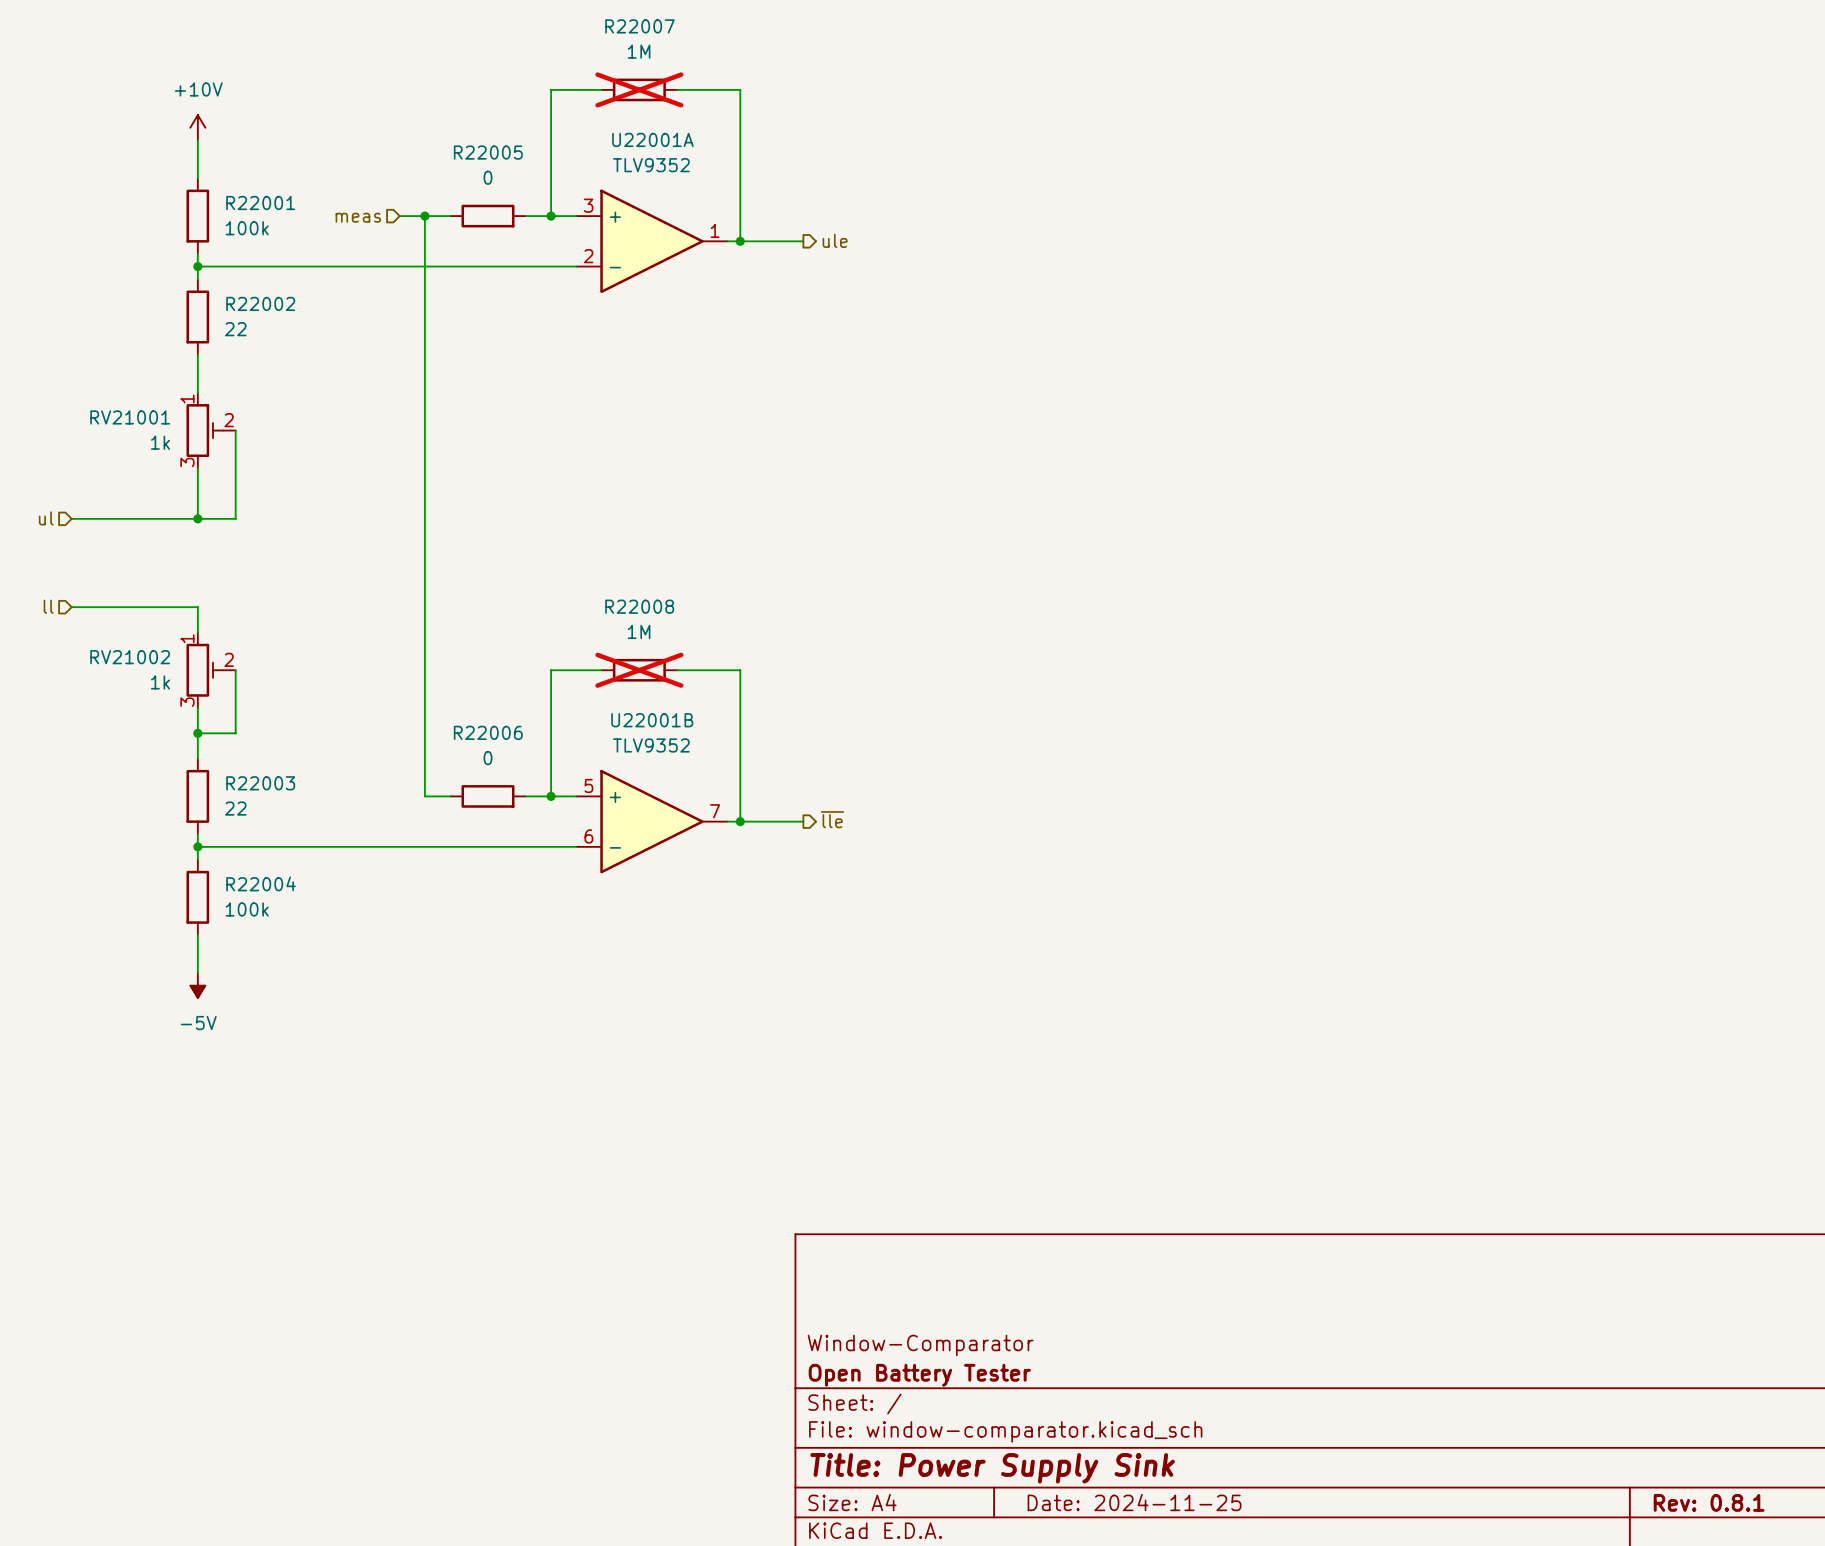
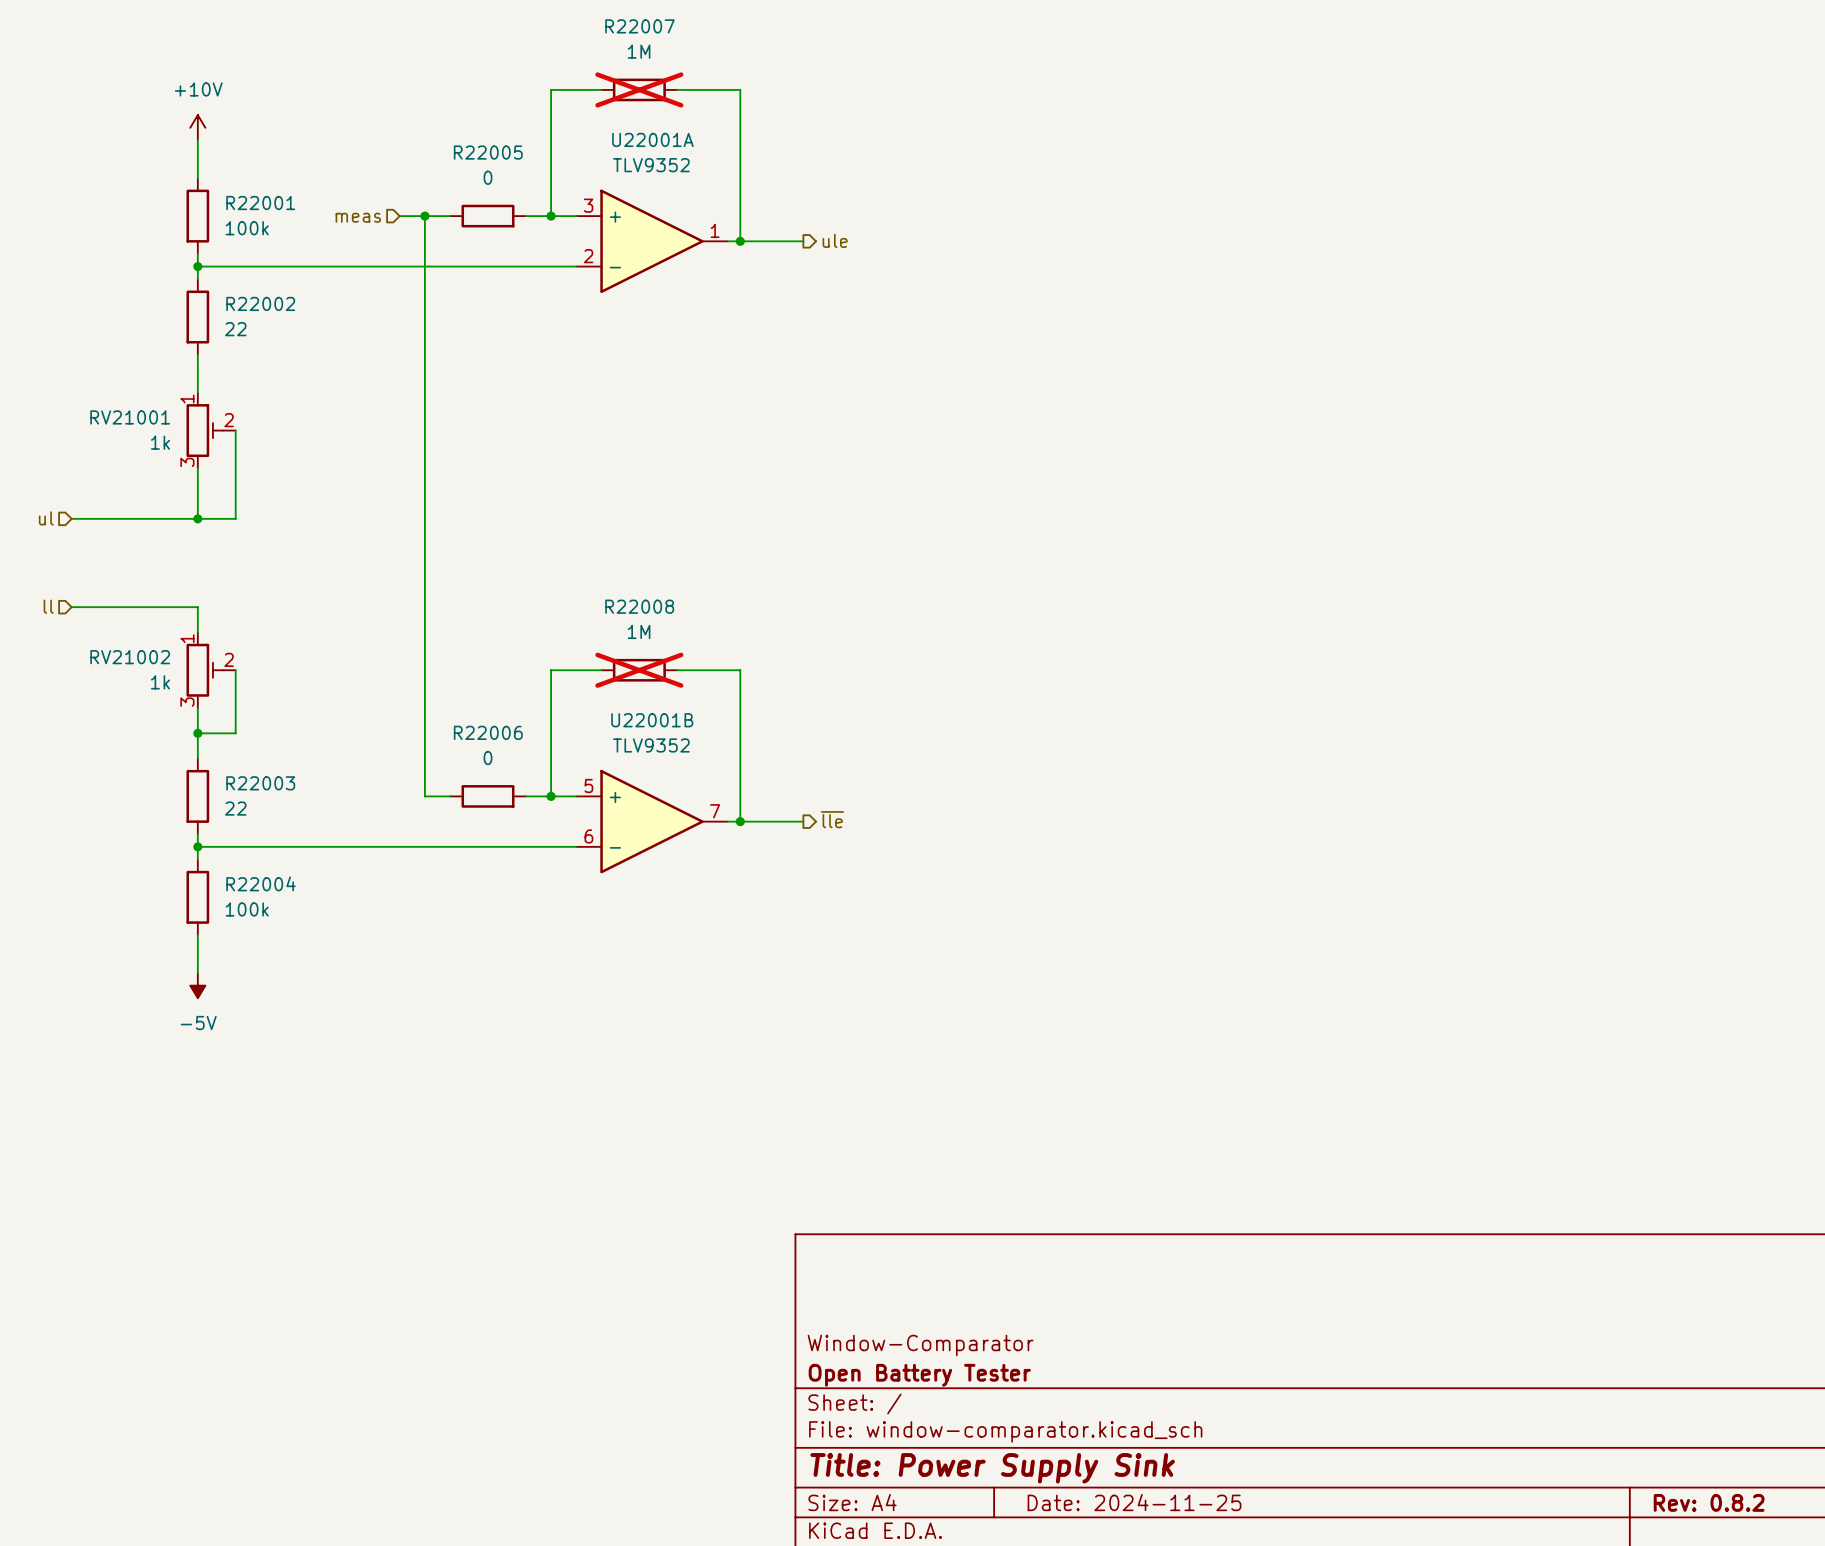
title block: Rev: 0.8.1 (1709, 1502) -> Rev: 0.8.2 (1709, 1502)

